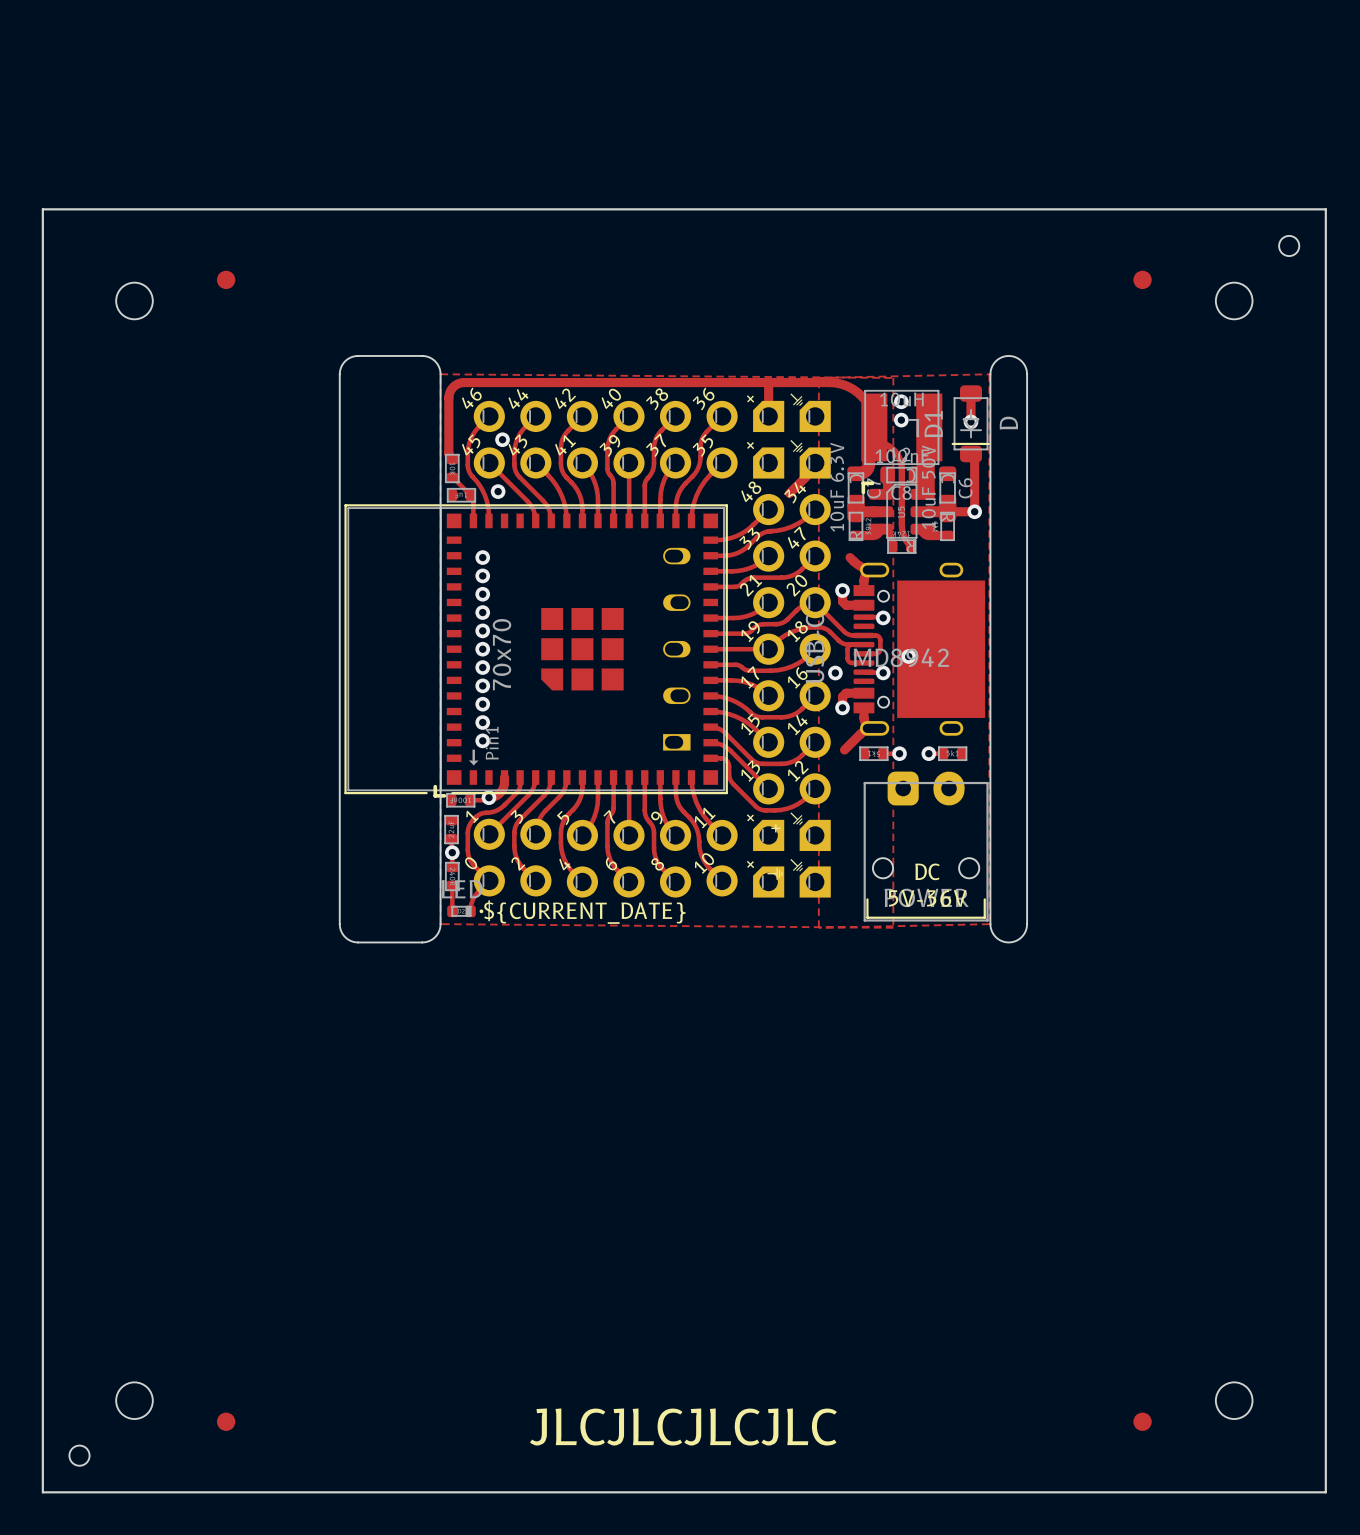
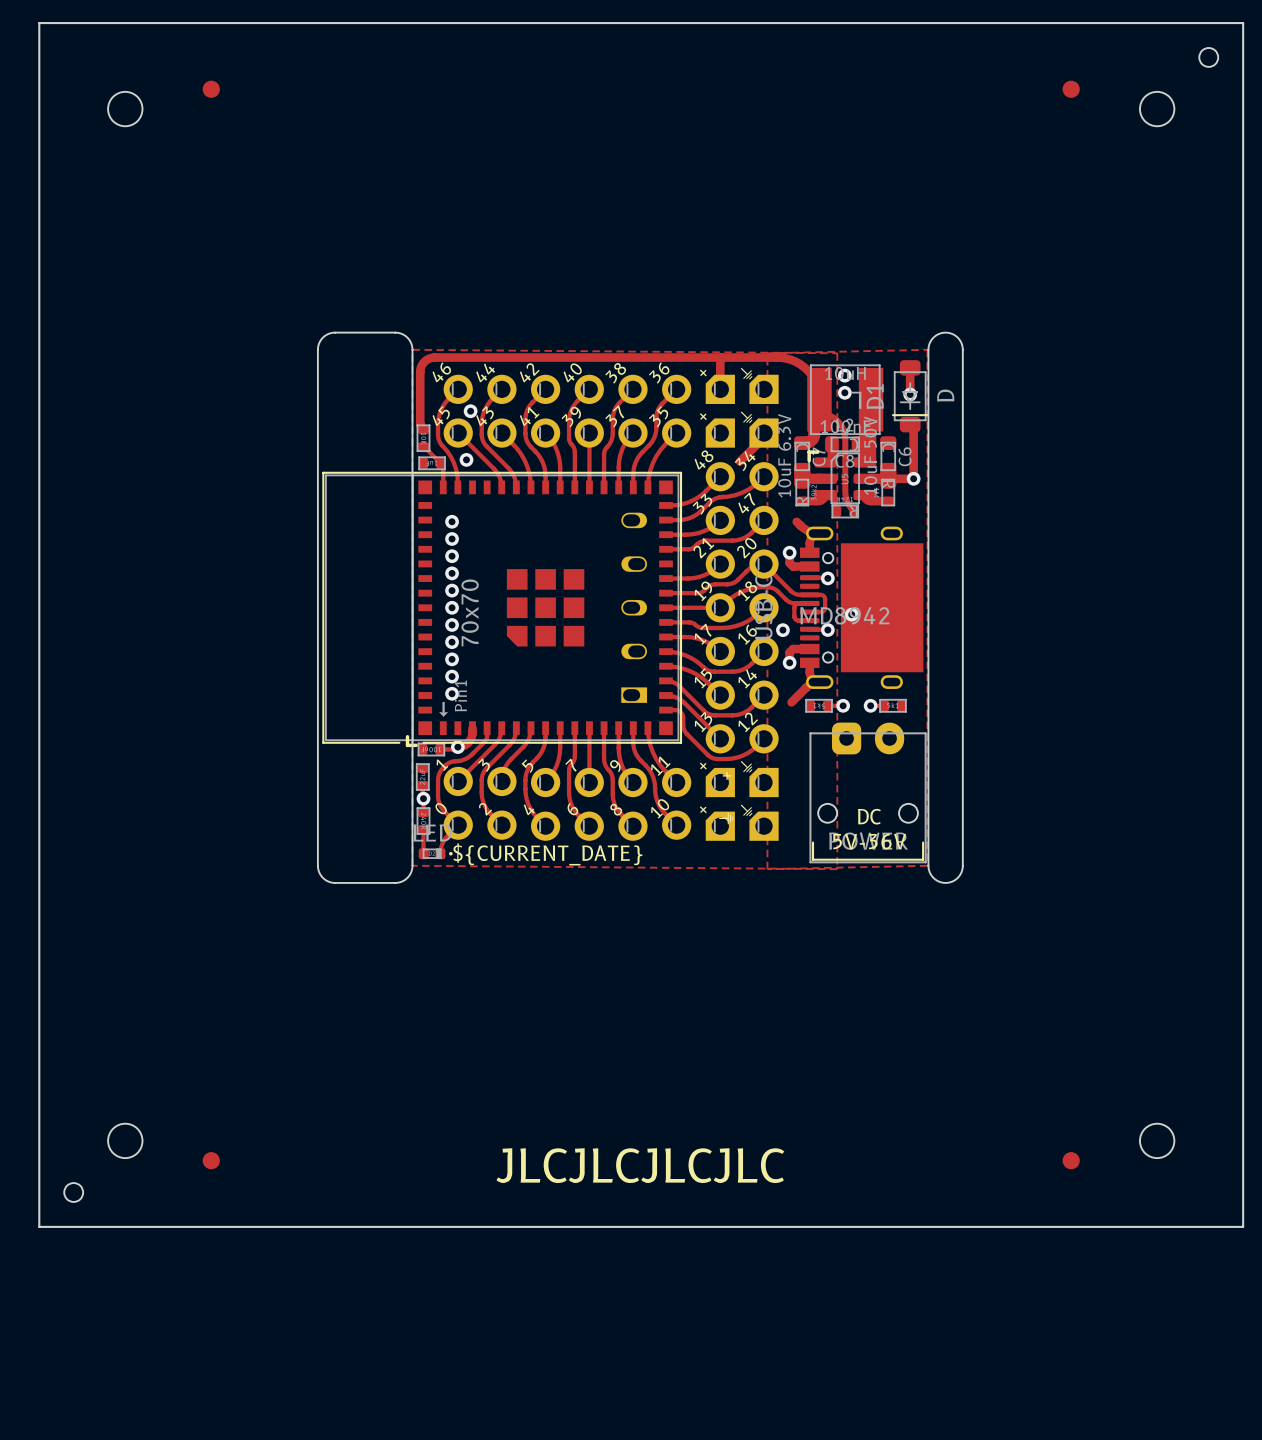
part position: (684, 850) -> (641, 624)

